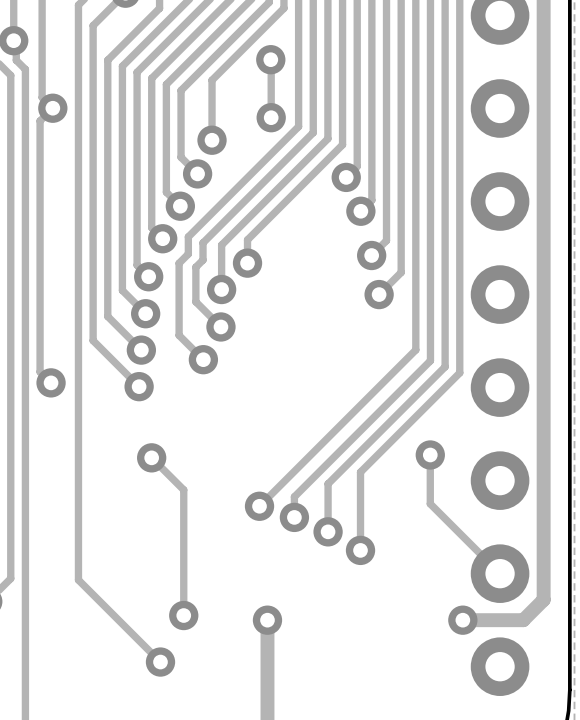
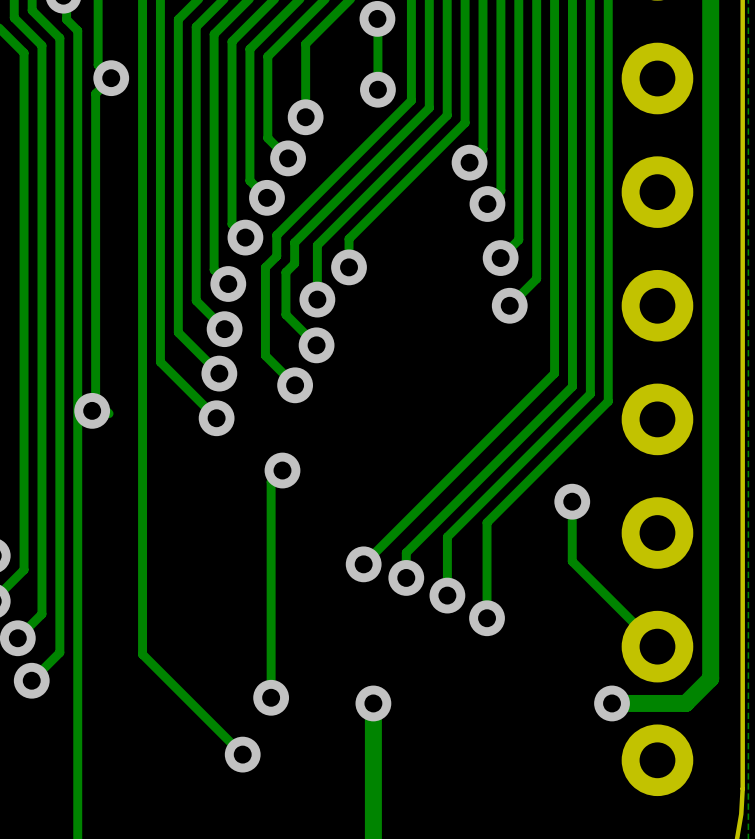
via position: (51, 382) -> (92, 410)
track: (151, 457) (183, 489) -> (282, 470) (271, 481) (271, 544)
via position: (151, 457) -> (282, 470)

